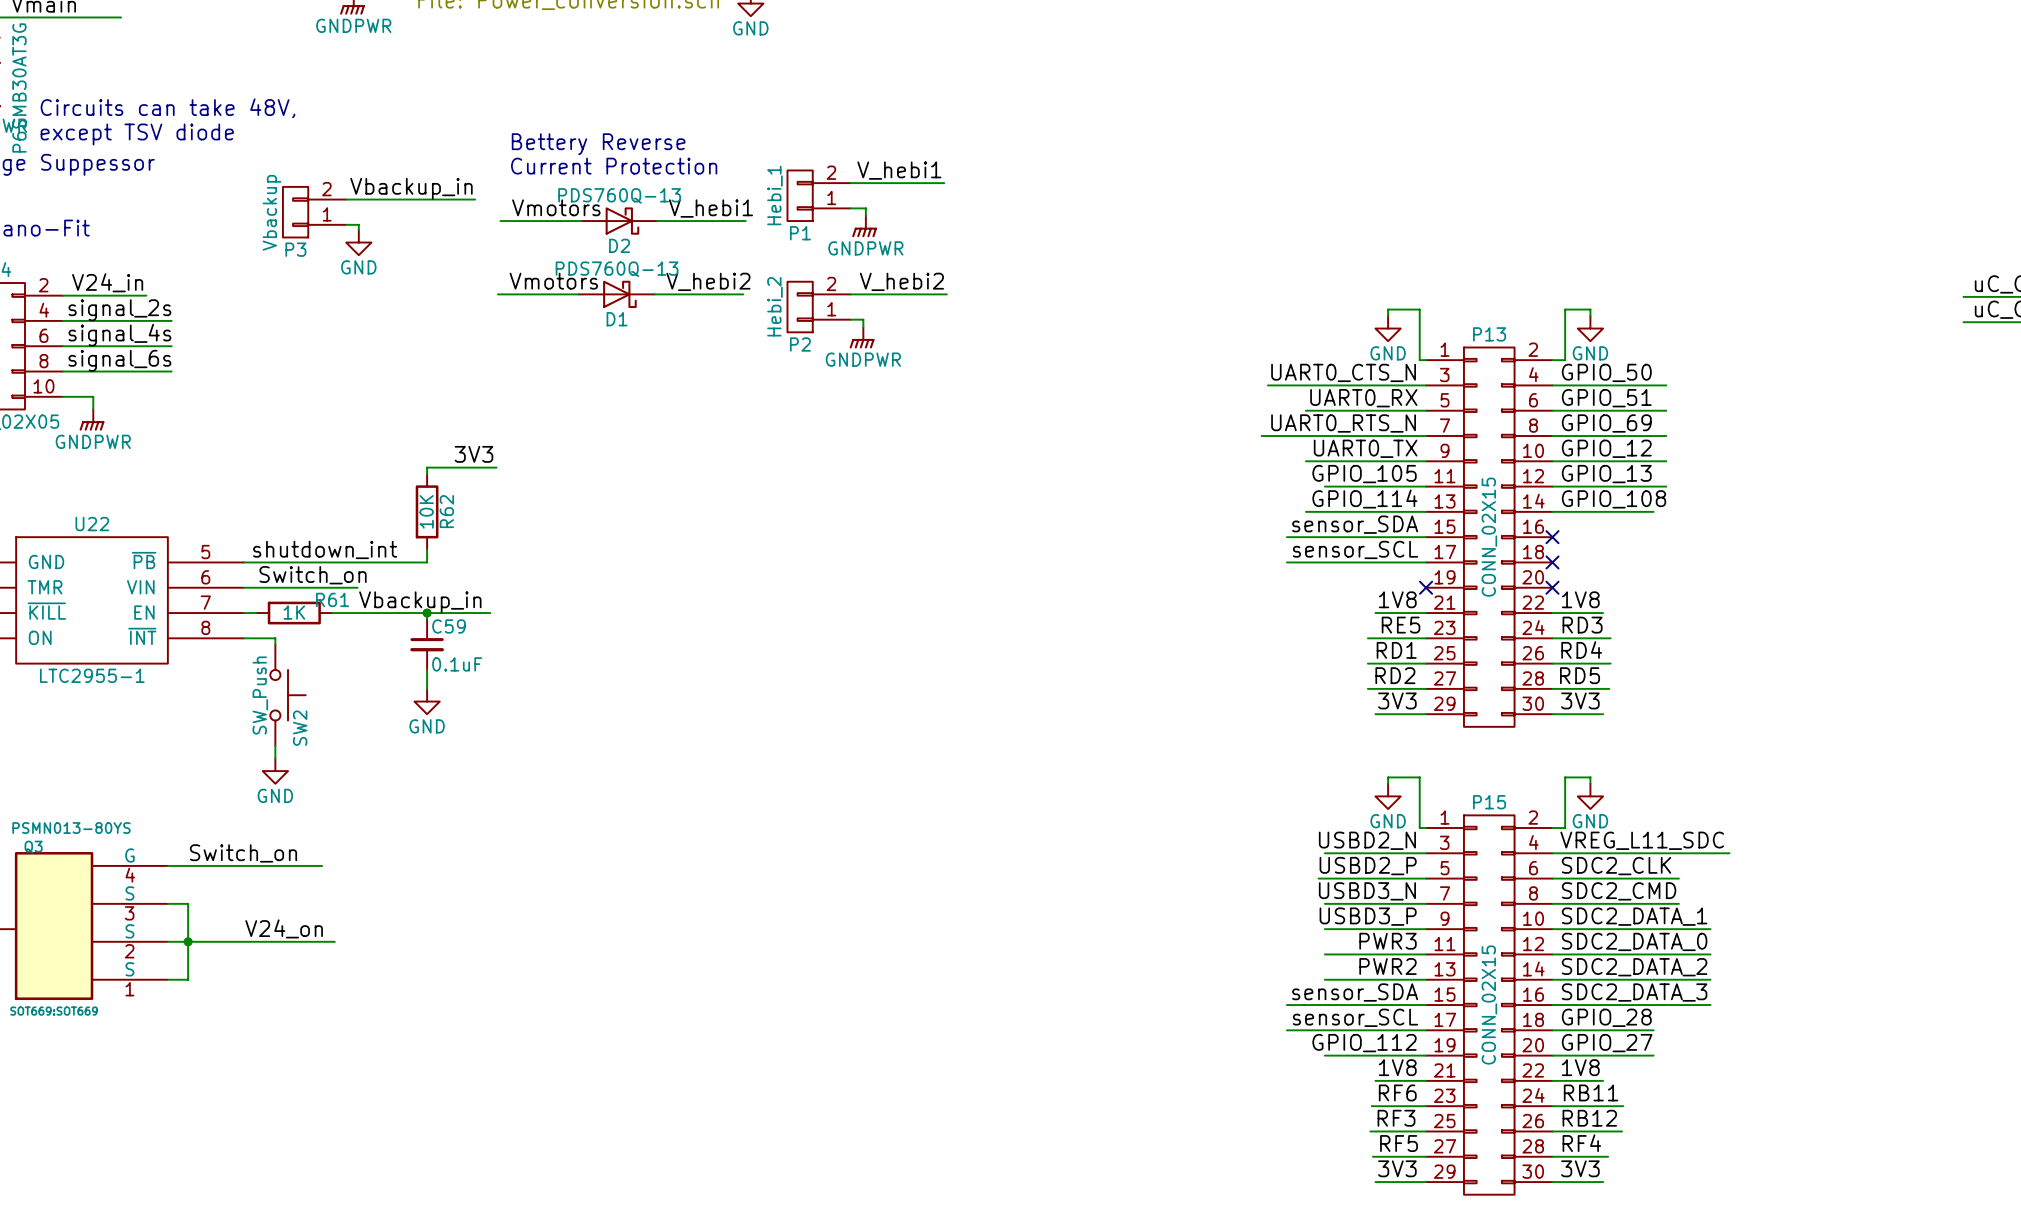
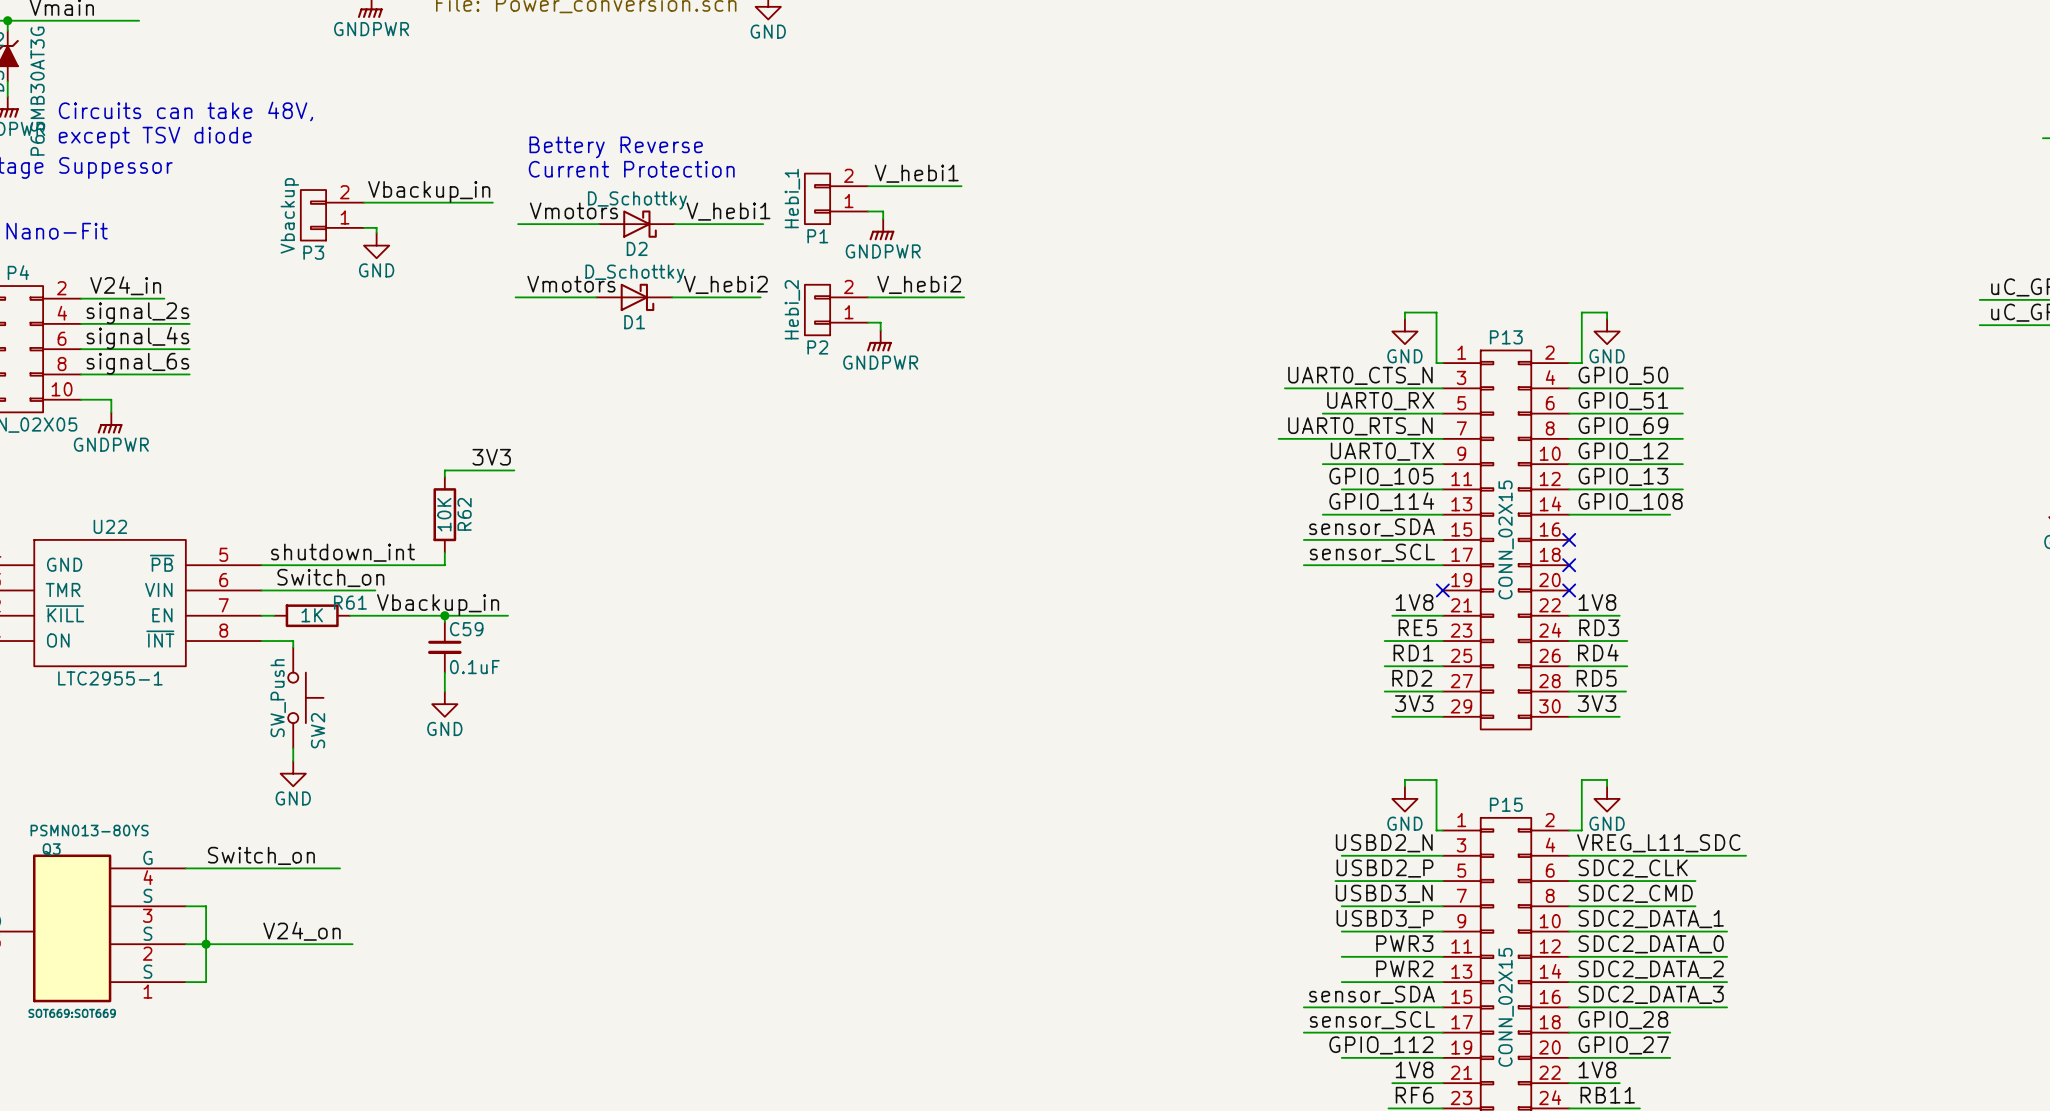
D2 value: PDS760Q-13 (619, 195) -> D_Schottky (637, 200)
D1 value: PDS760Q-13 (617, 269) -> D_Schottky (634, 273)

